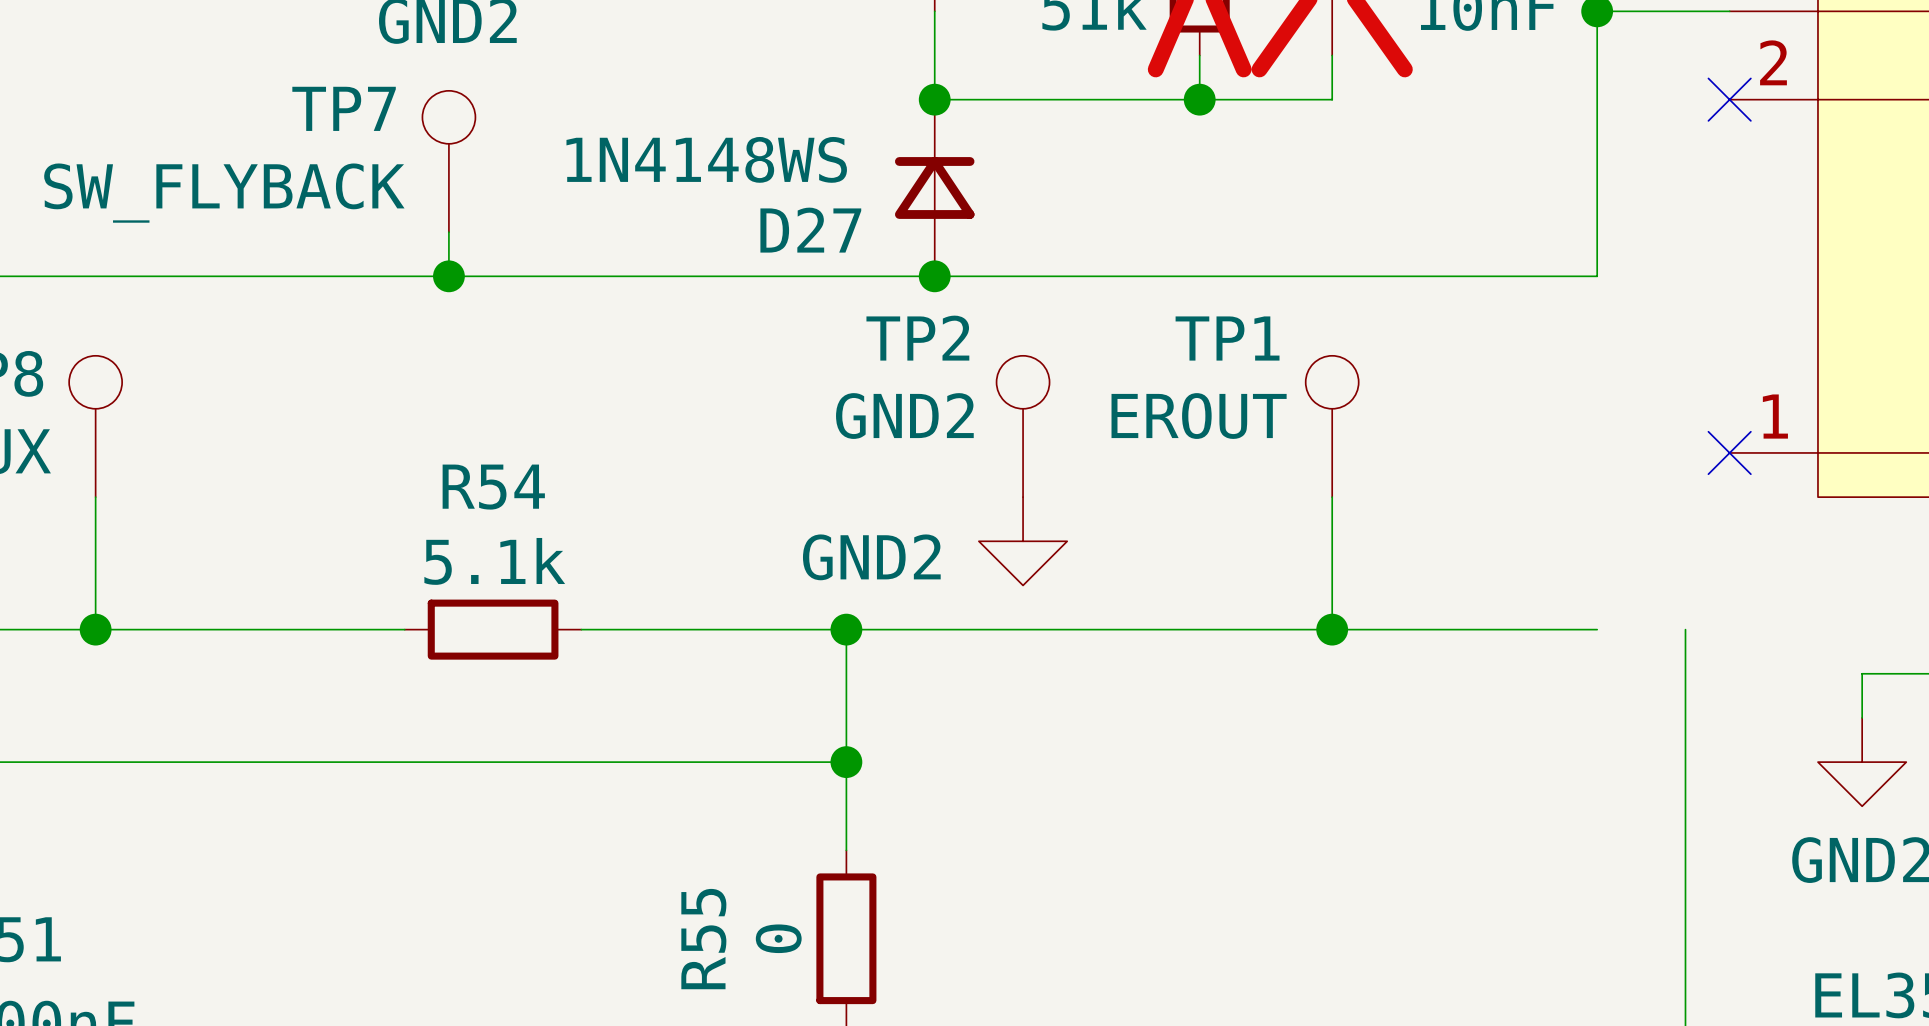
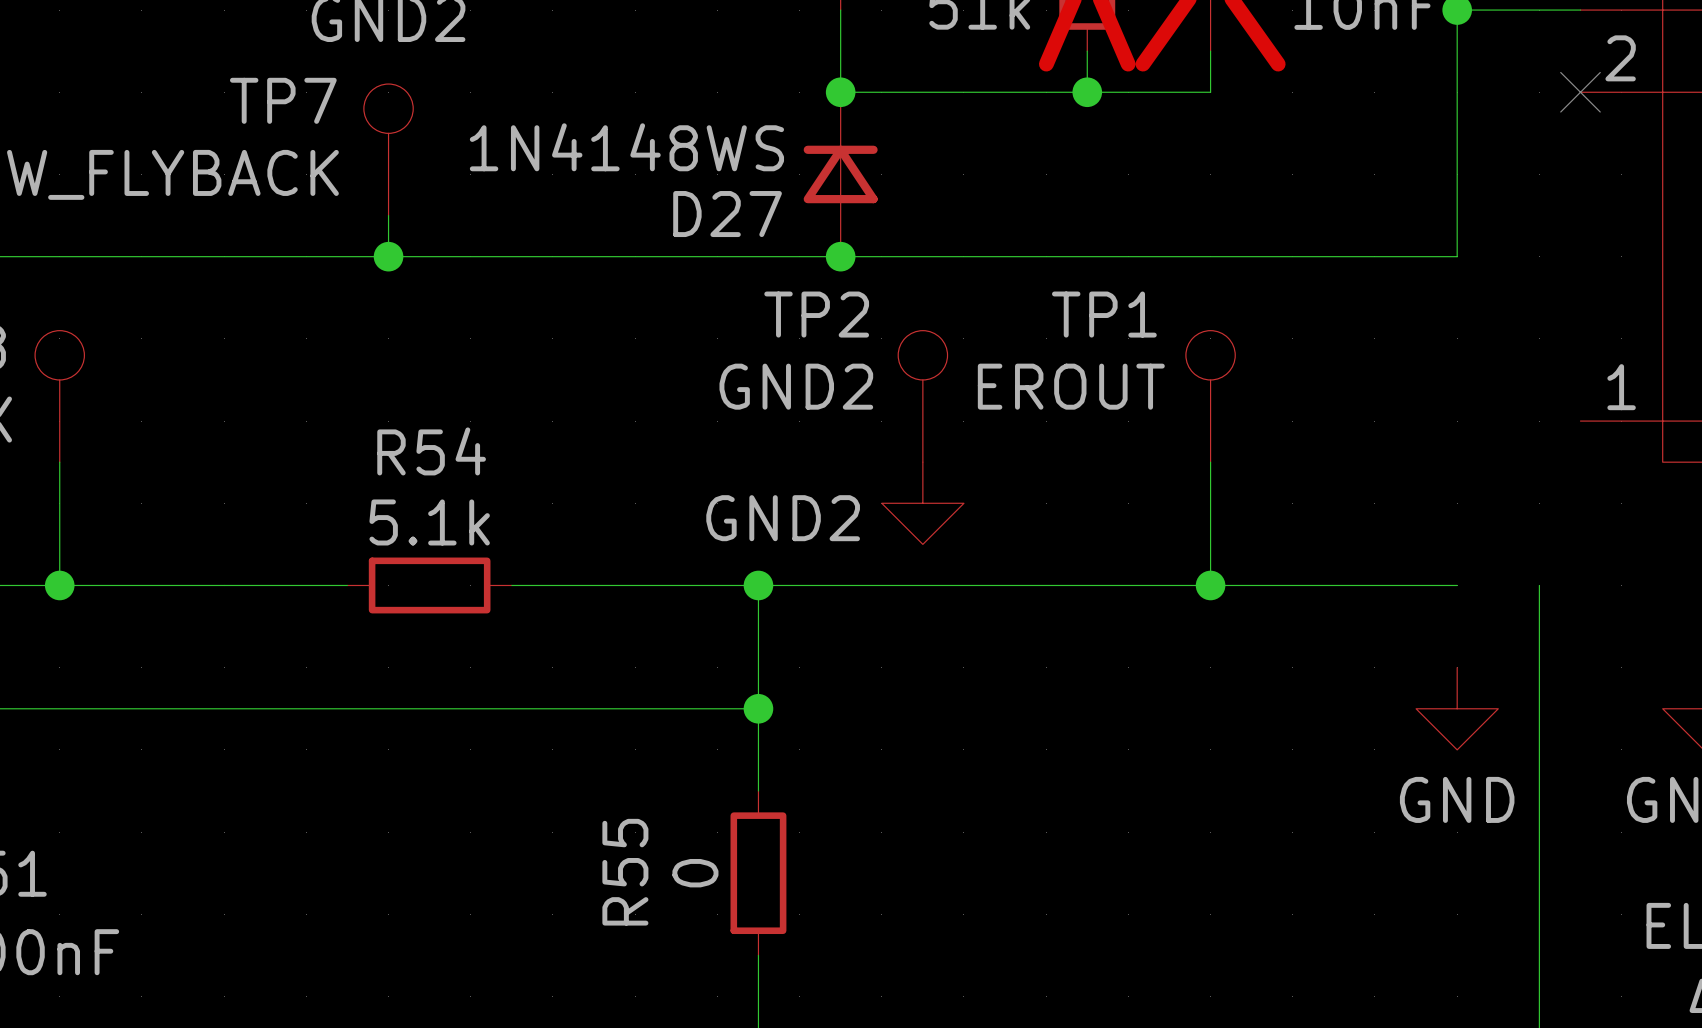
no-connect mark: (1729, 452) -> none
power symbol: none -> GND (1457, 708)

